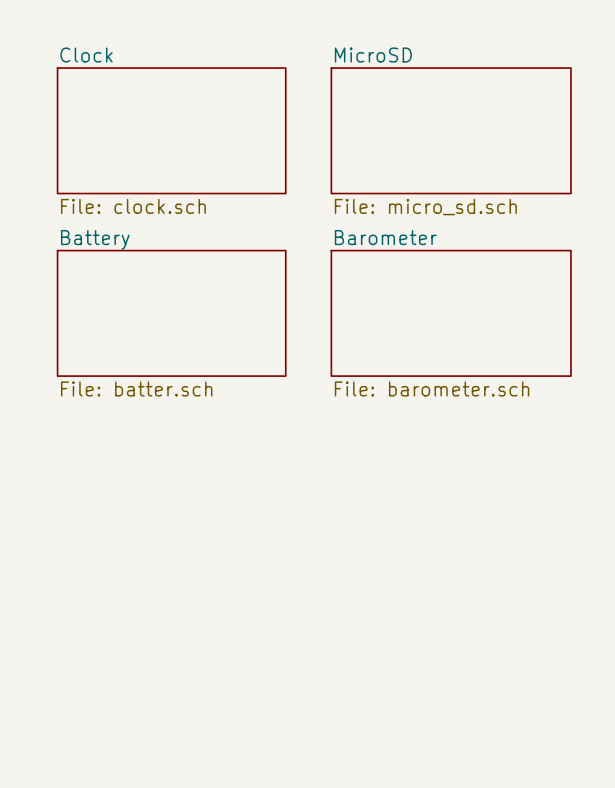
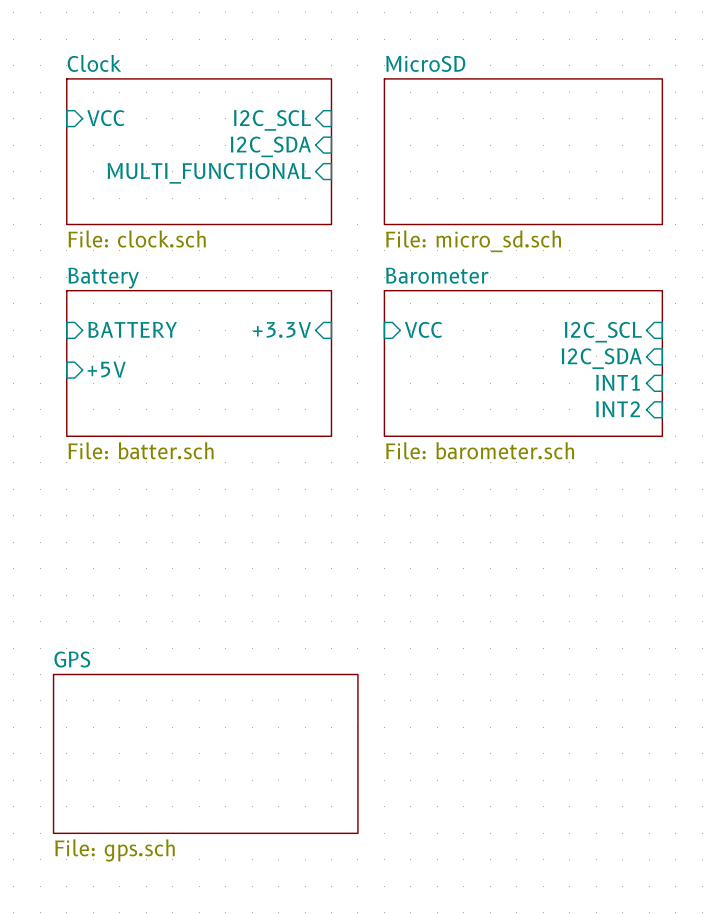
sheet pin: none -> VCC (105, 118)
sheet pin: none -> I2C_SCL (272, 120)
sheet pin: none -> I2C_SDA (270, 146)
sheet pin: none -> MULTI_FUNCTIONAL (209, 173)
sheet pin: none -> BATTERY (132, 329)
sheet pin: none -> +3.3V (282, 329)
sheet pin: none -> VCC (423, 329)
sheet pin: none -> I2C_SCL (603, 332)
sheet pin: none -> I2C_SDA (601, 358)
sheet pin: none -> +5V (106, 369)
sheet pin: none -> INT1 (618, 382)
sheet pin: none -> INT2 (618, 409)
sheet GPS: none -> File: gps.sch (205, 753)

